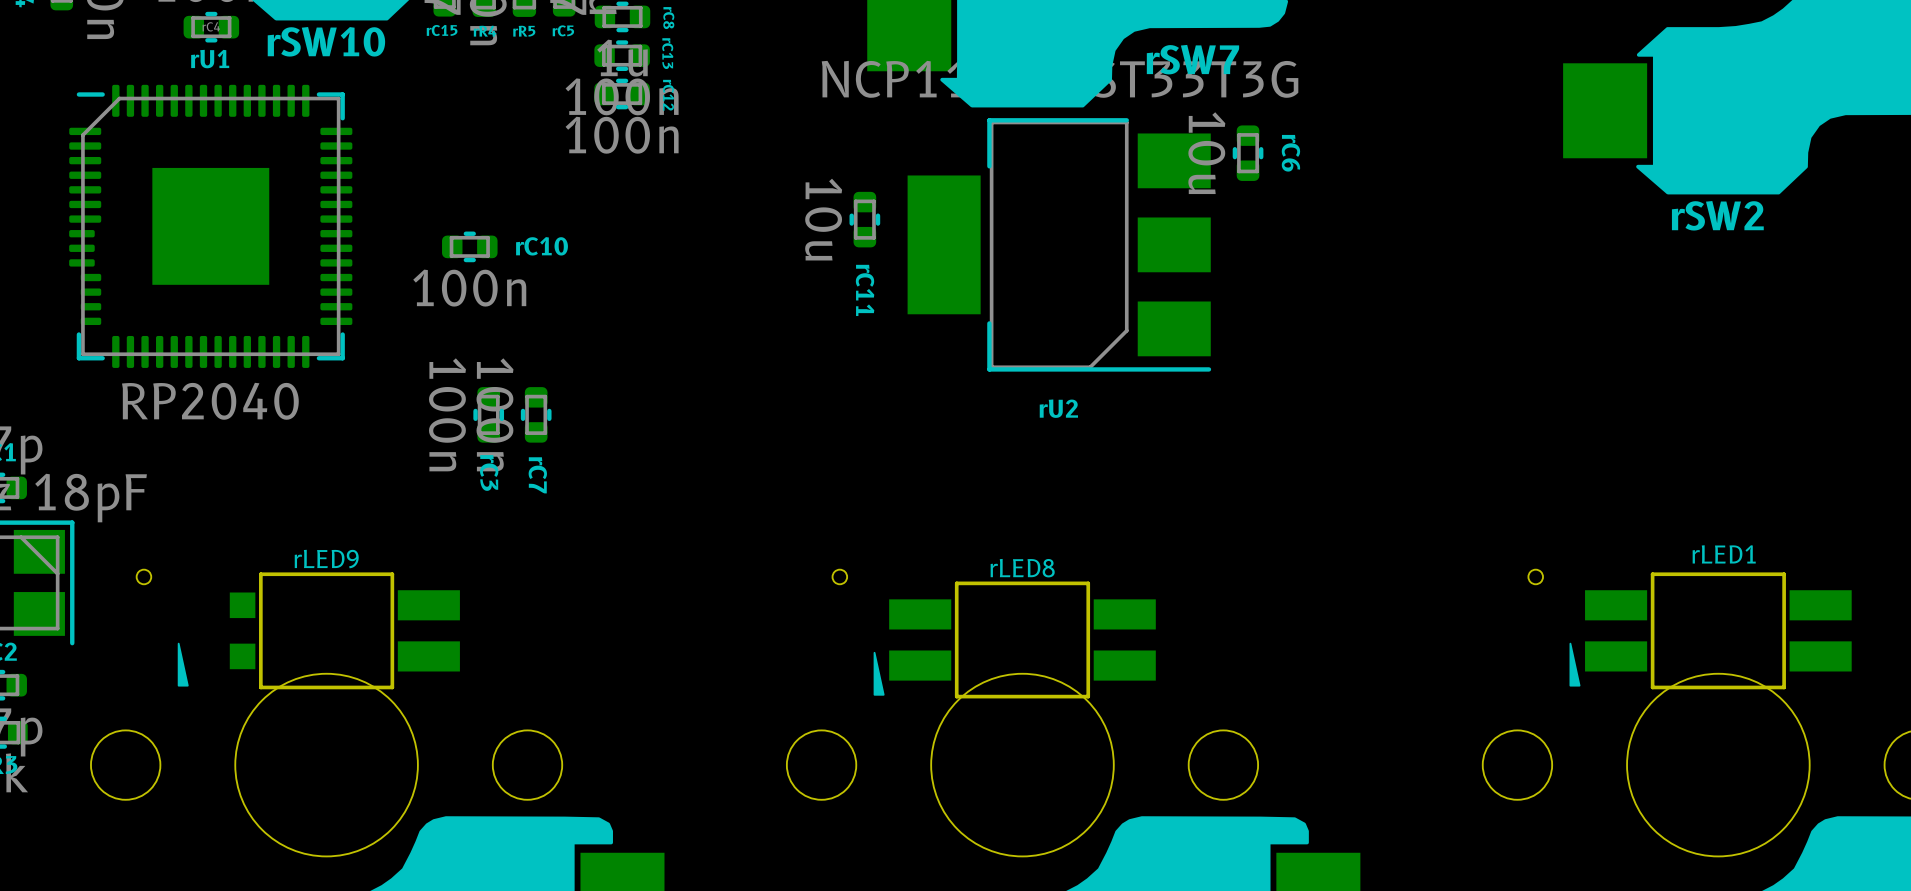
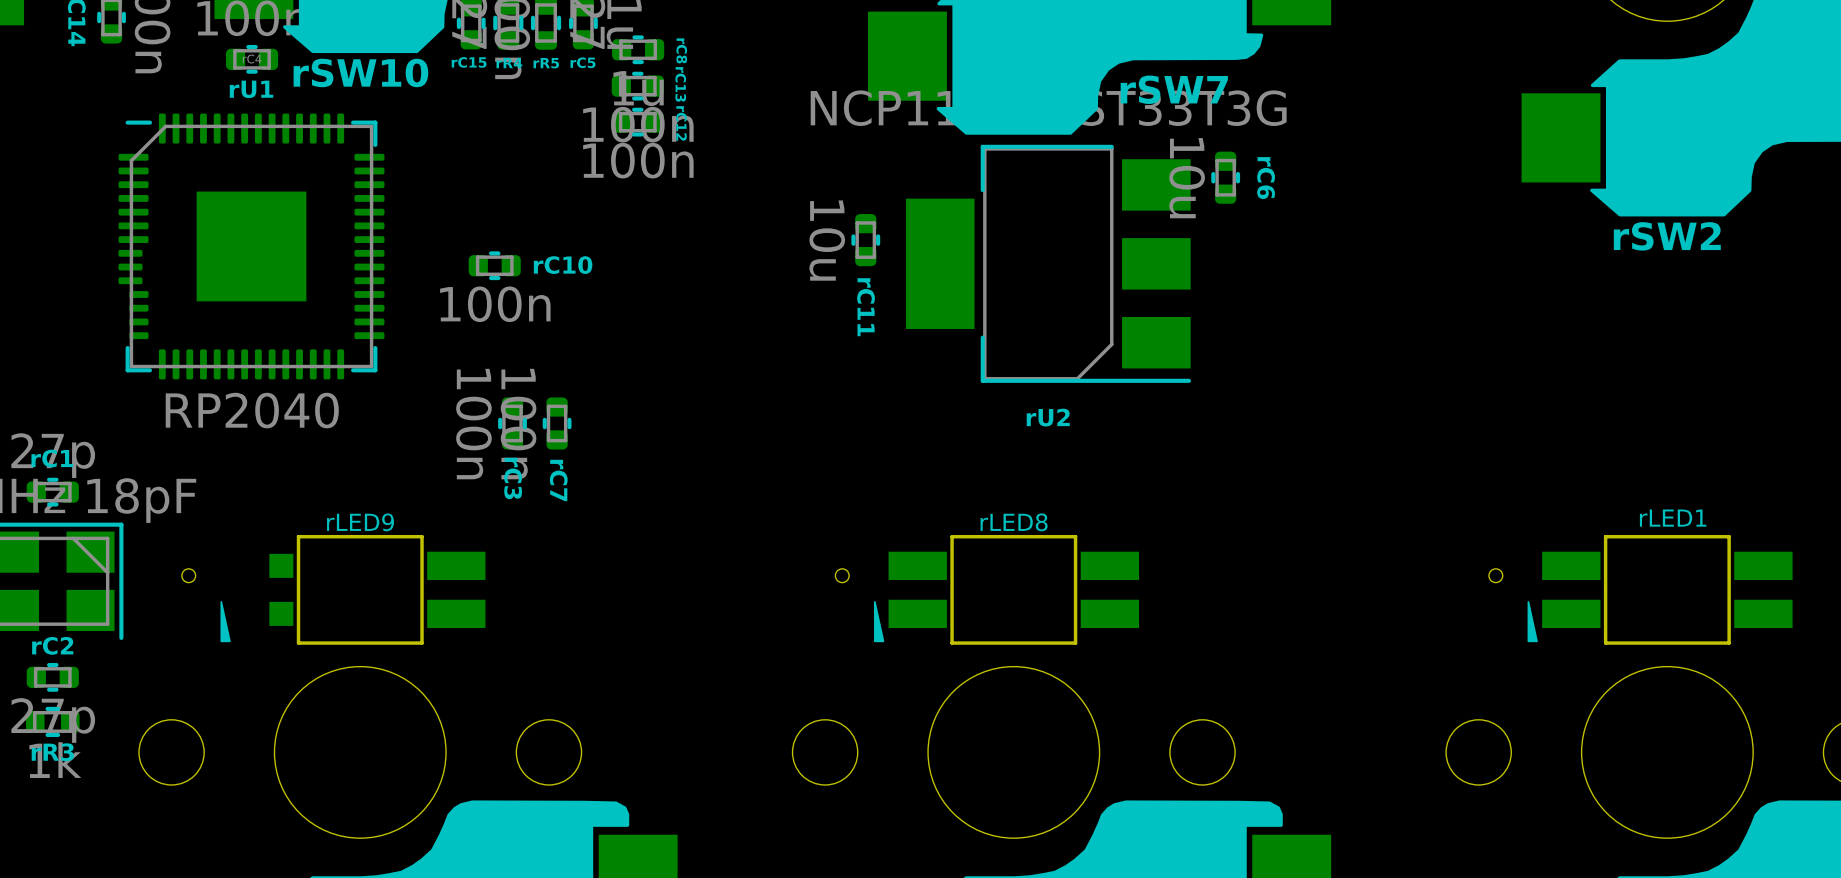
rLED9 position: (318, 630) -> (352, 589)
rLED1 position: (1710, 630) -> (1660, 589)
rLED8 position: (1014, 639) -> (1006, 589)

